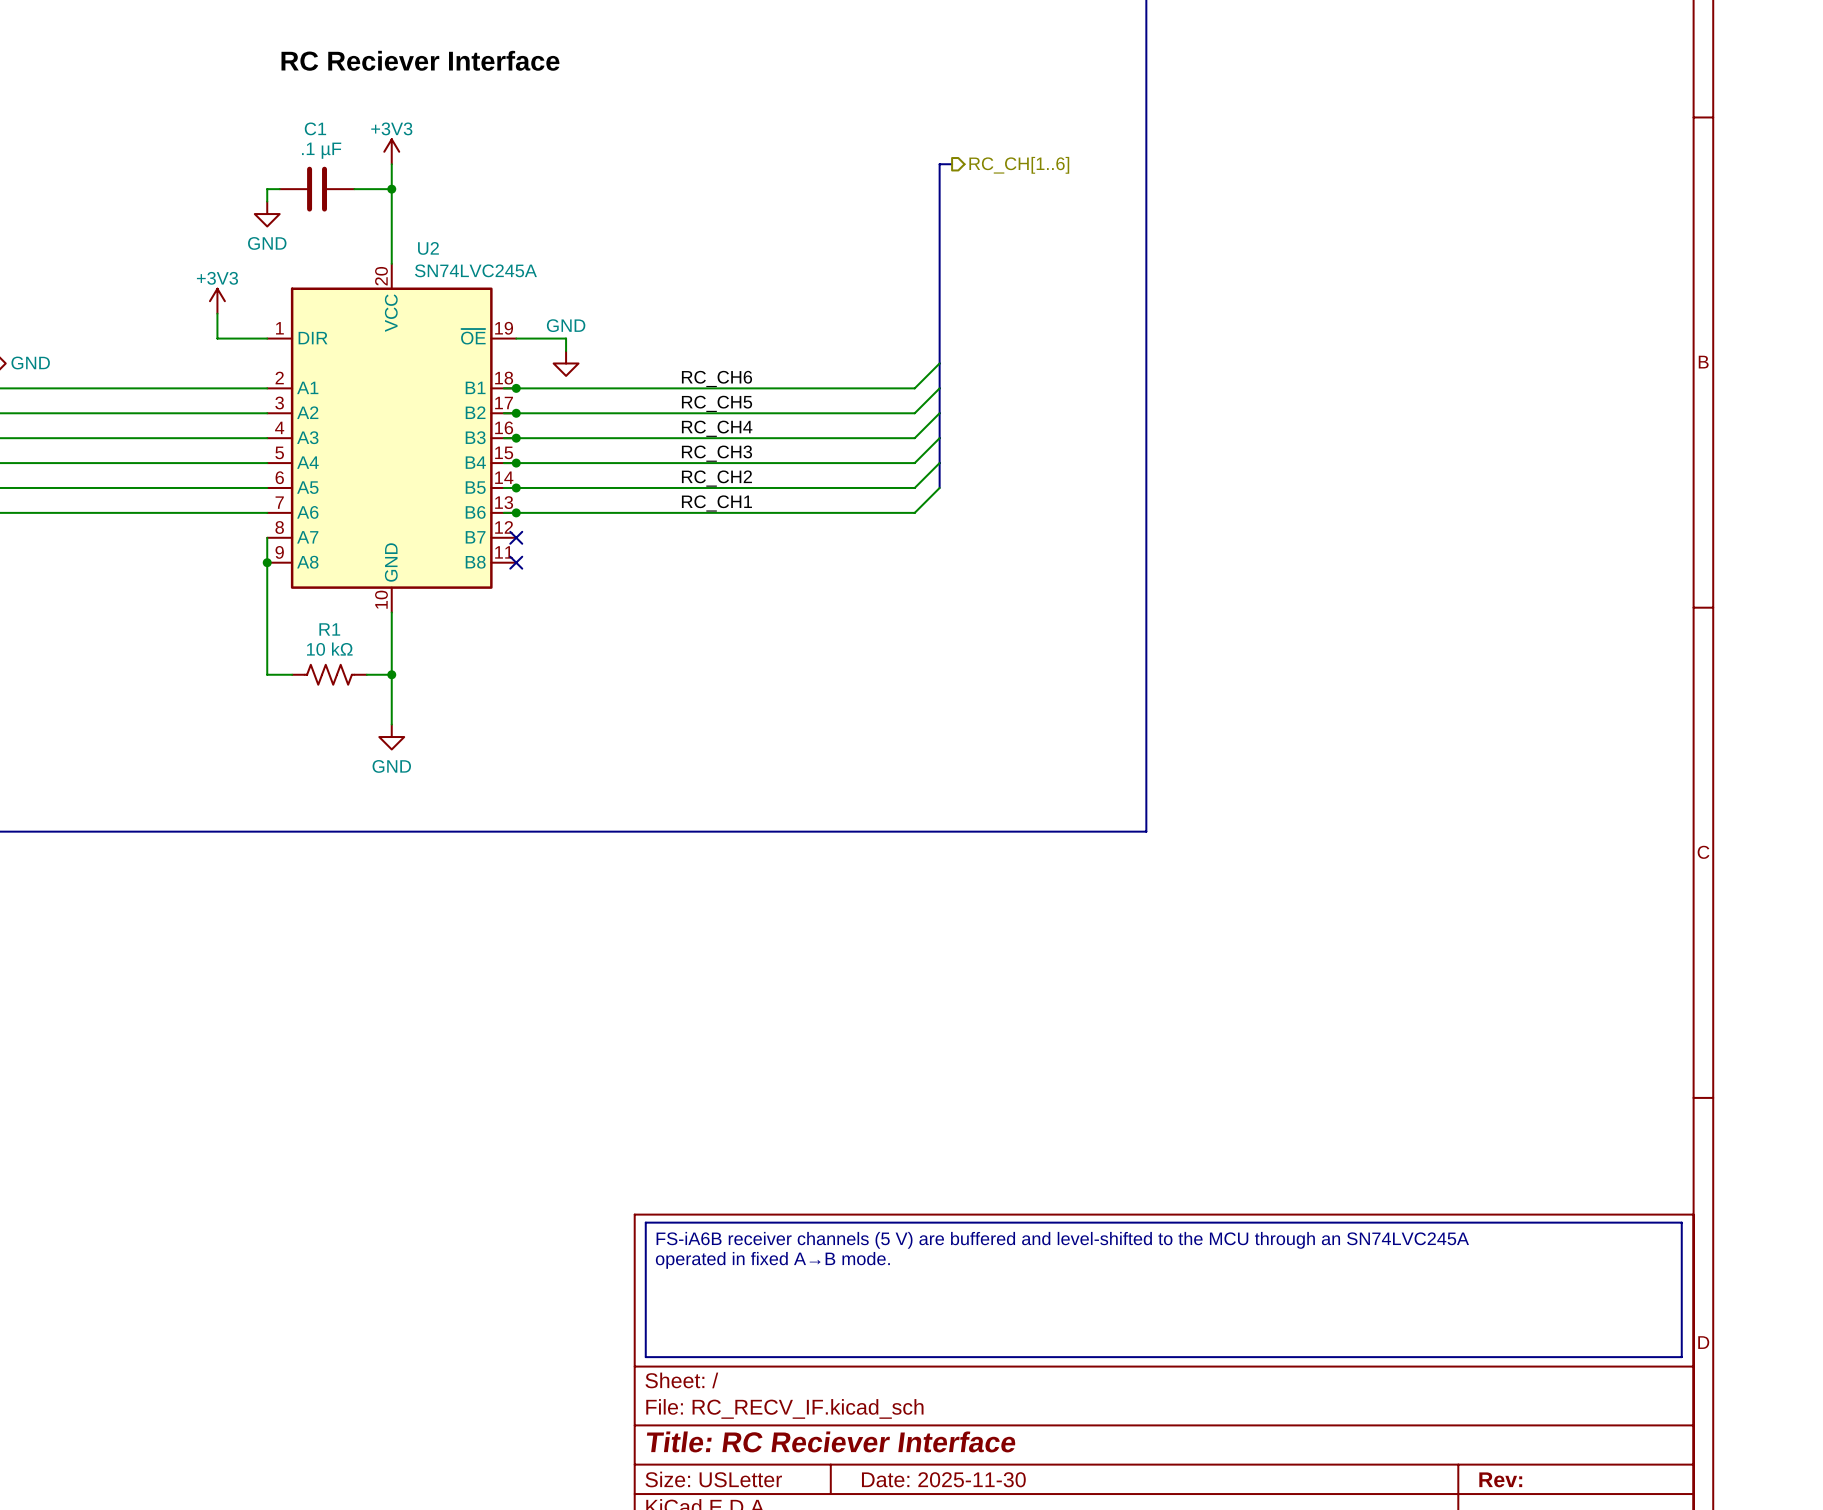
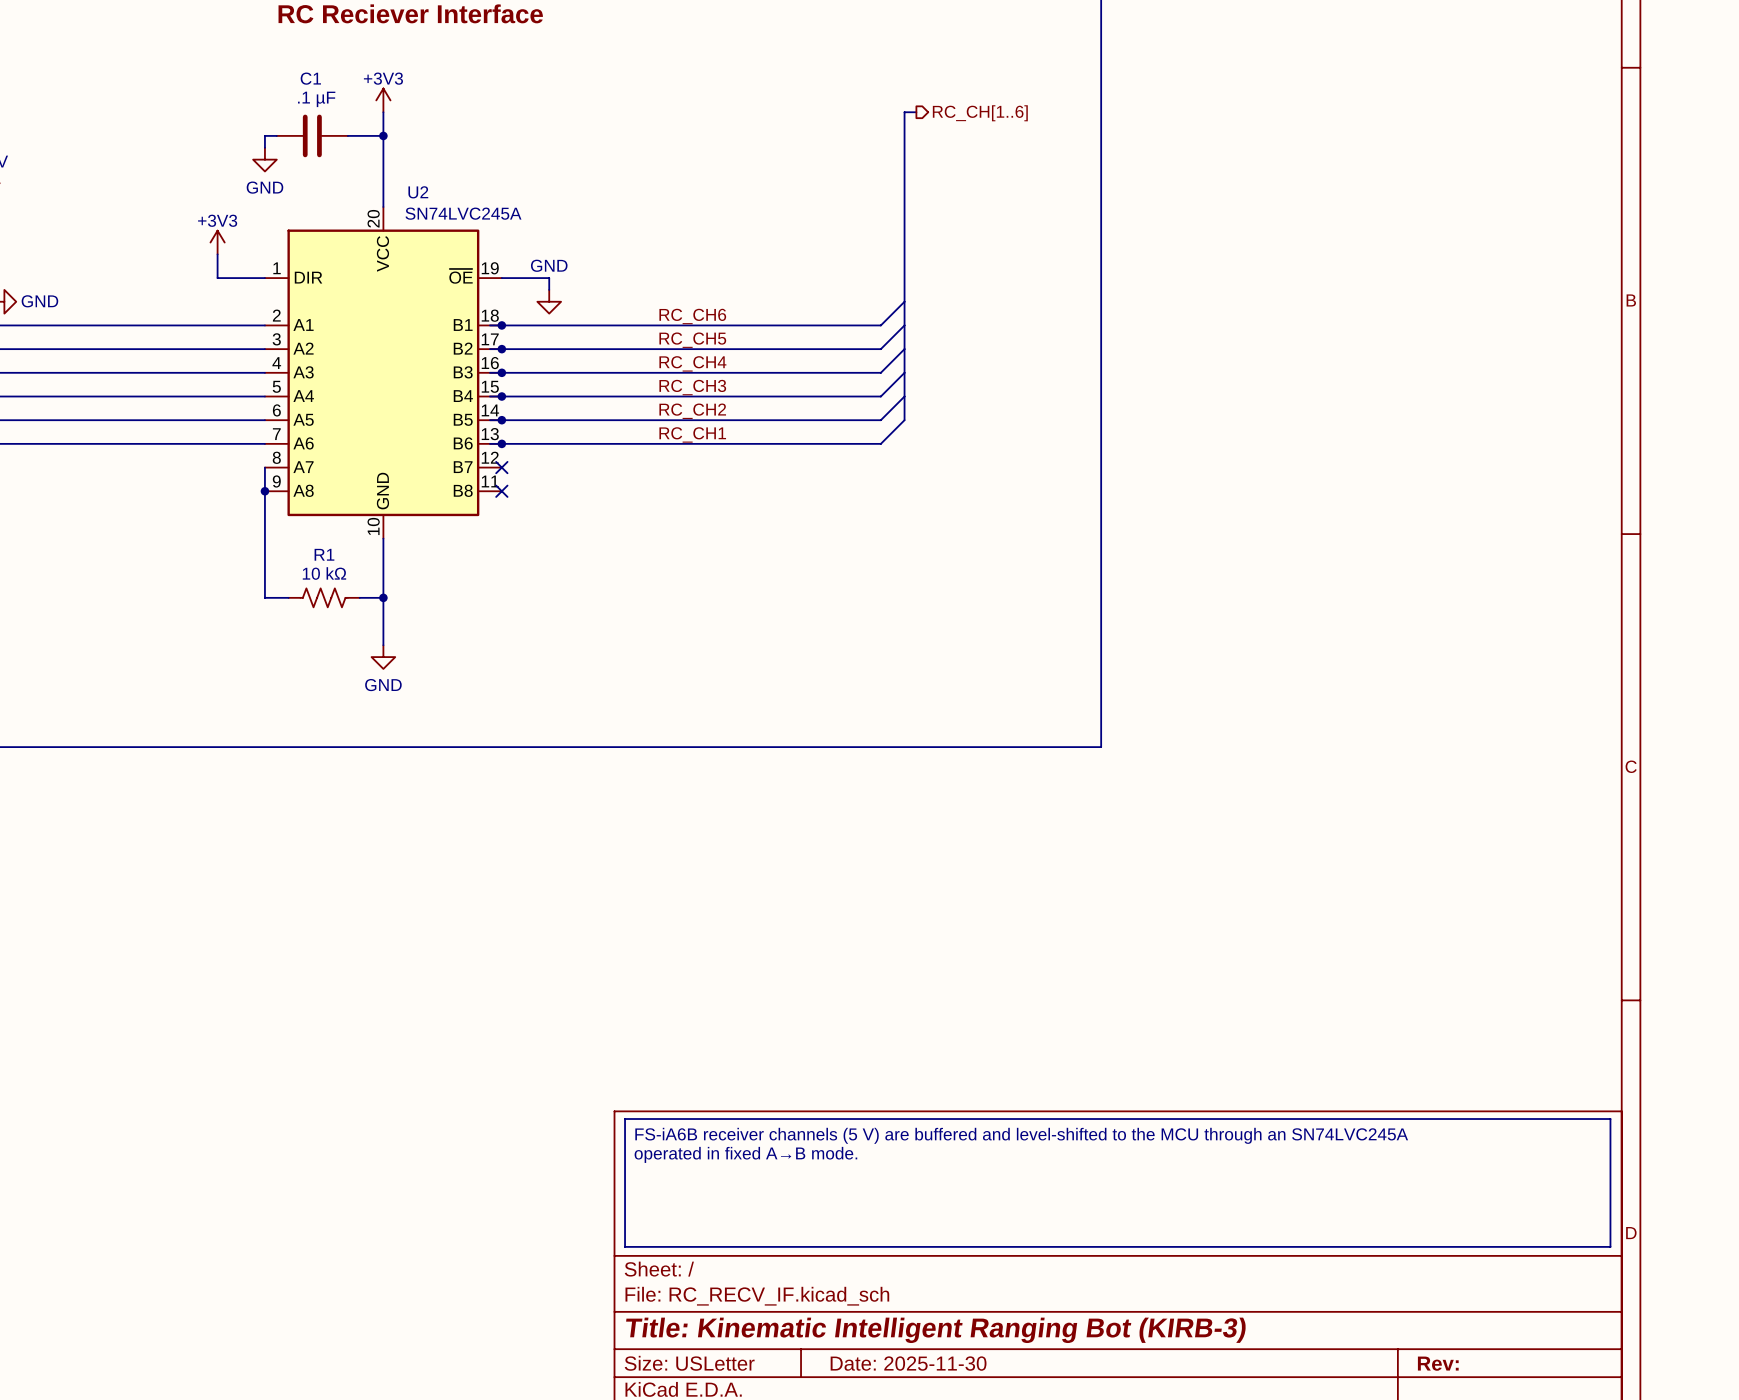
title block: Title: RC Reciever Interface (831, 1441) -> Title: Kinematic Intelligent Ranging Bot (KIRB-3) (935, 1330)

